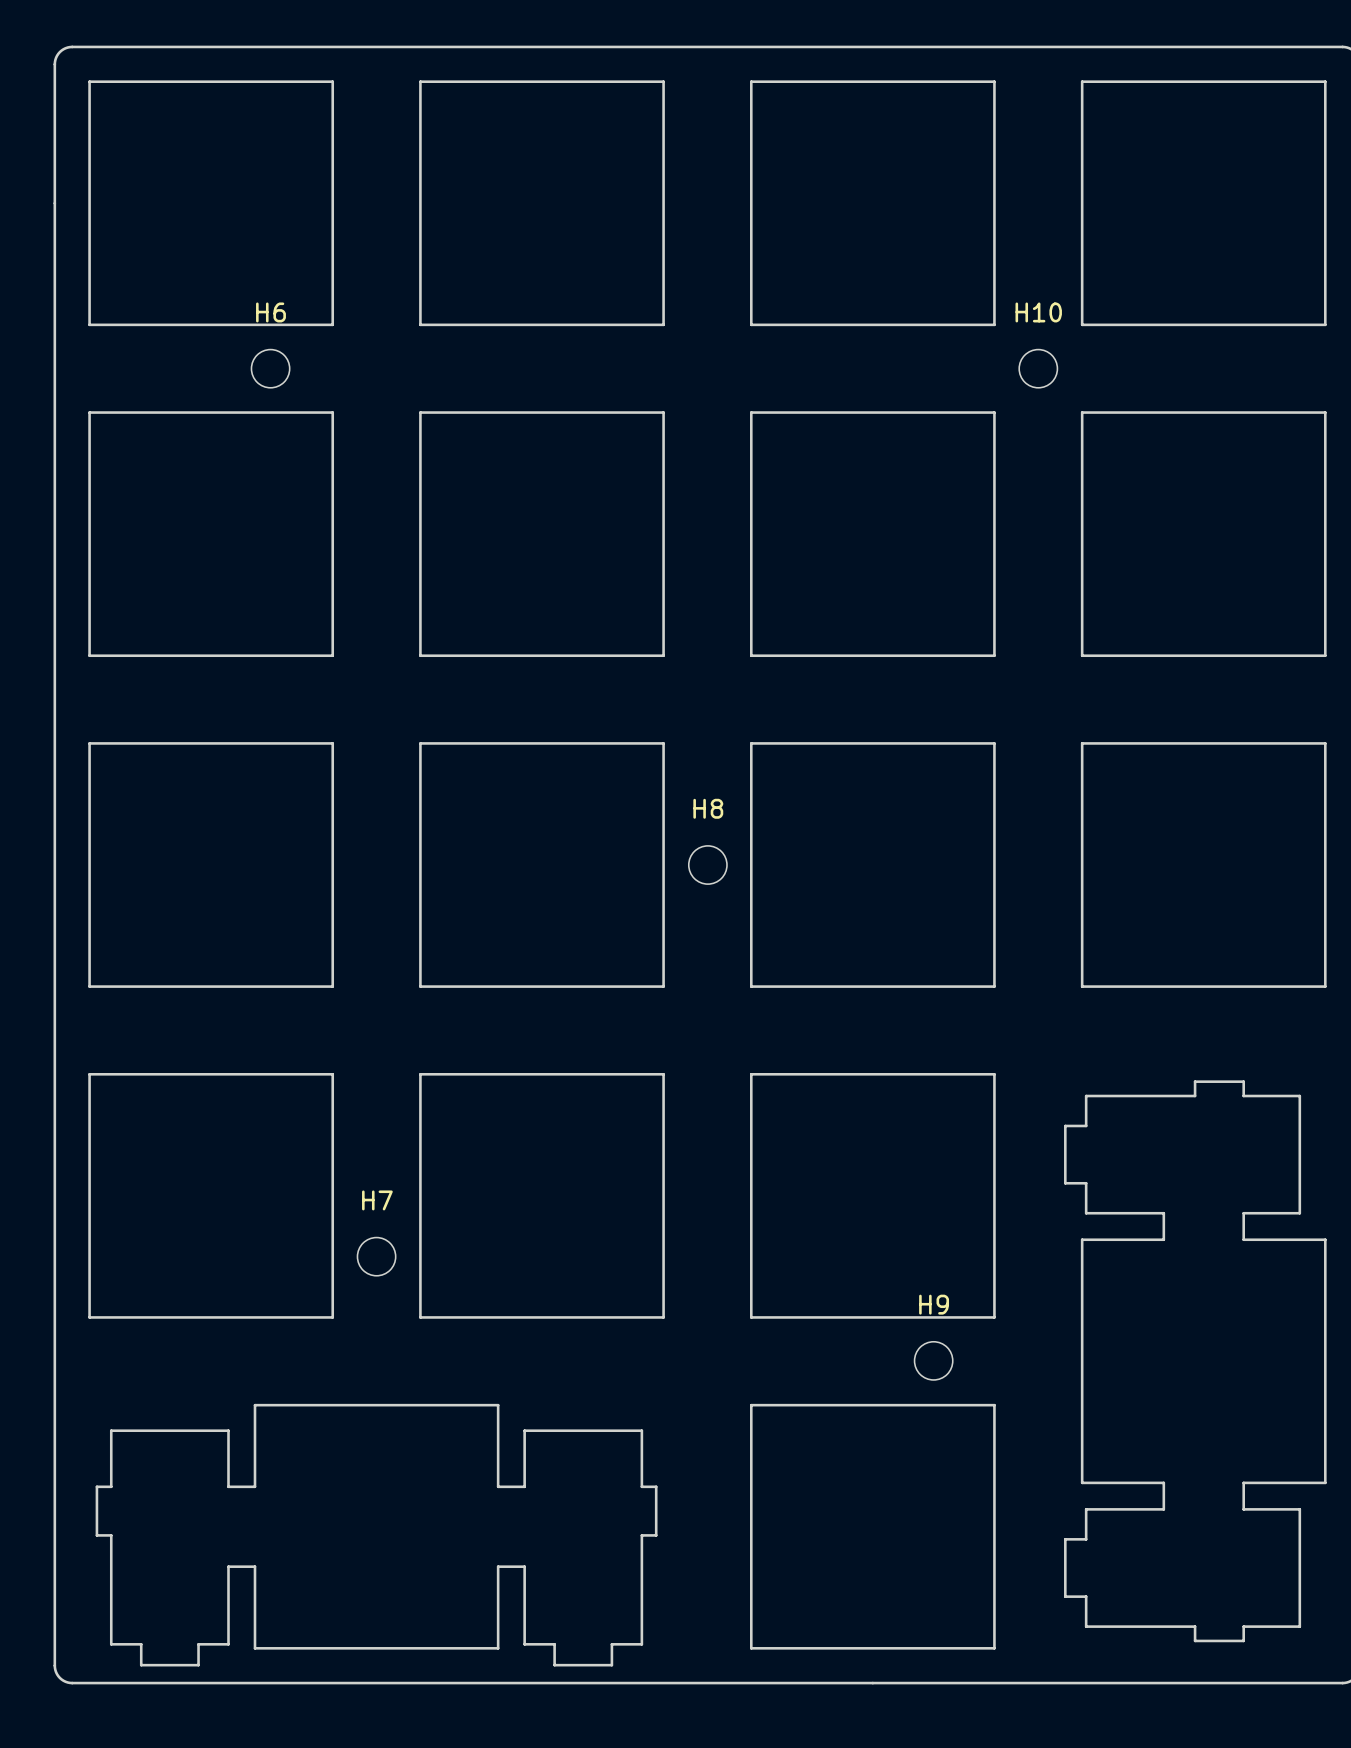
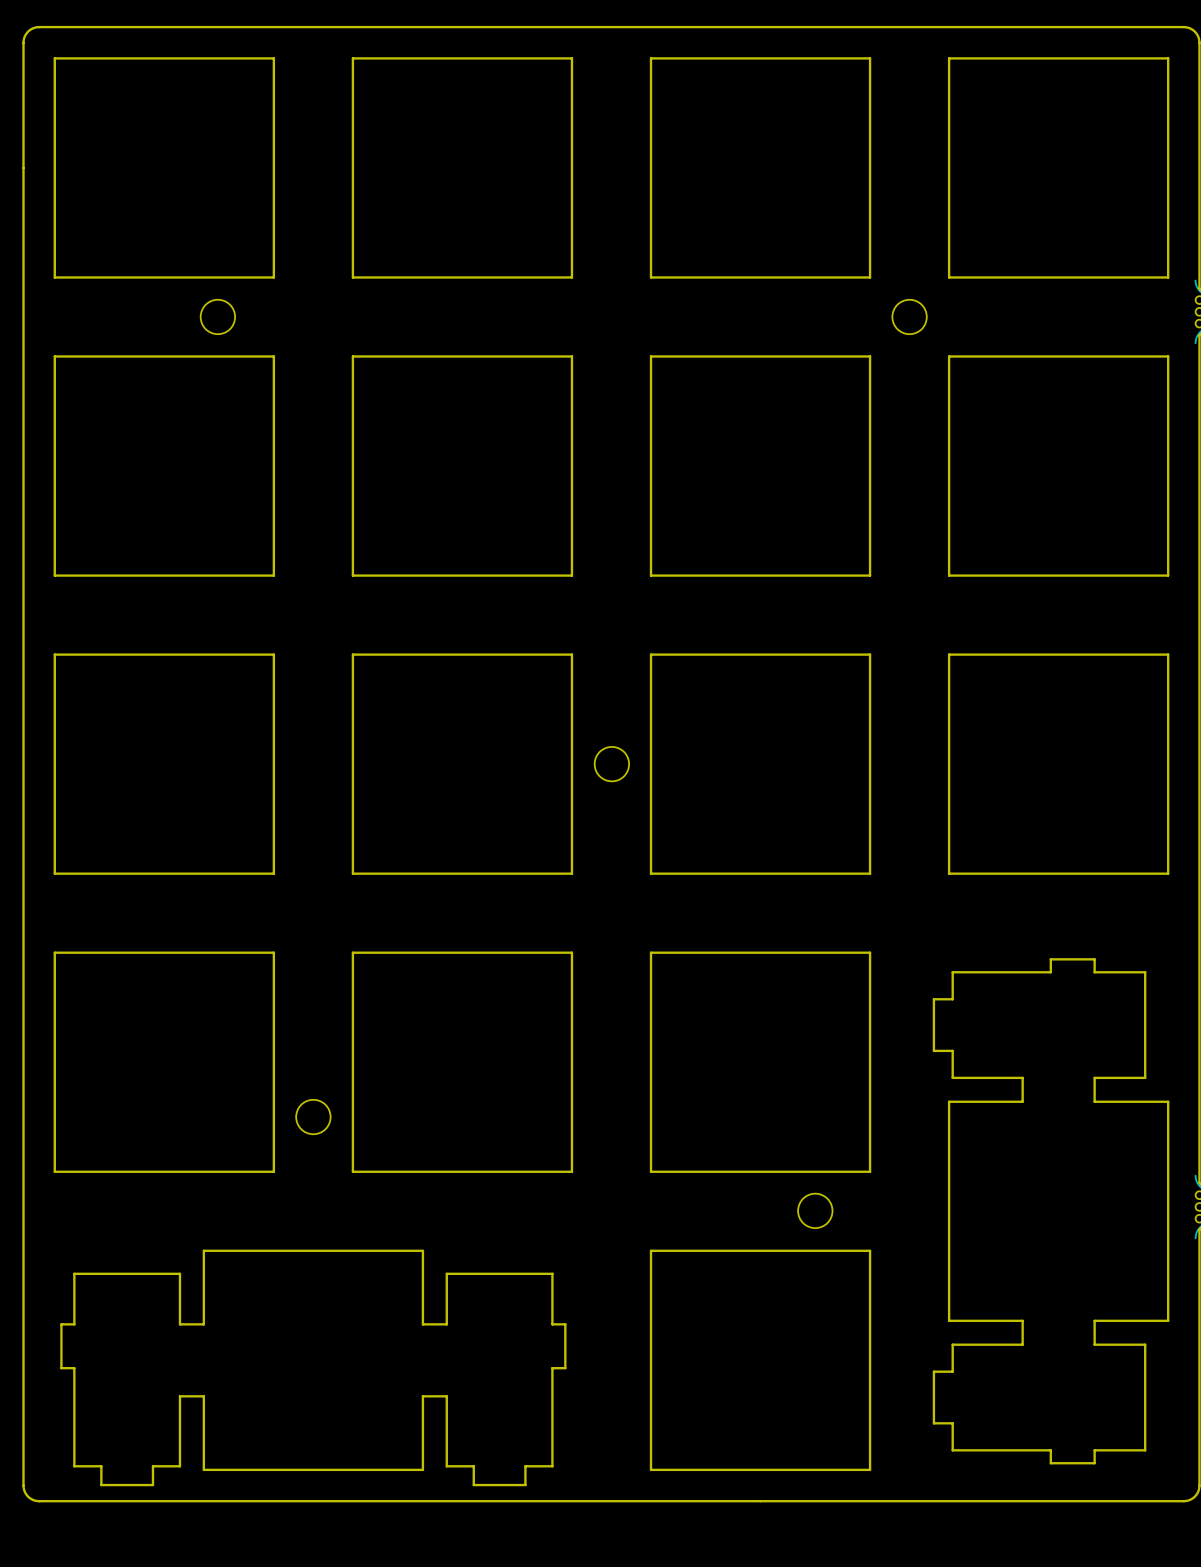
H6 name: H6 (270, 312) -> none
H10 name: H10 (1038, 312) -> none
H8 name: H8 (708, 808) -> none
H7 name: H7 (377, 1200) -> none
H9 name: H9 (934, 1304) -> none

